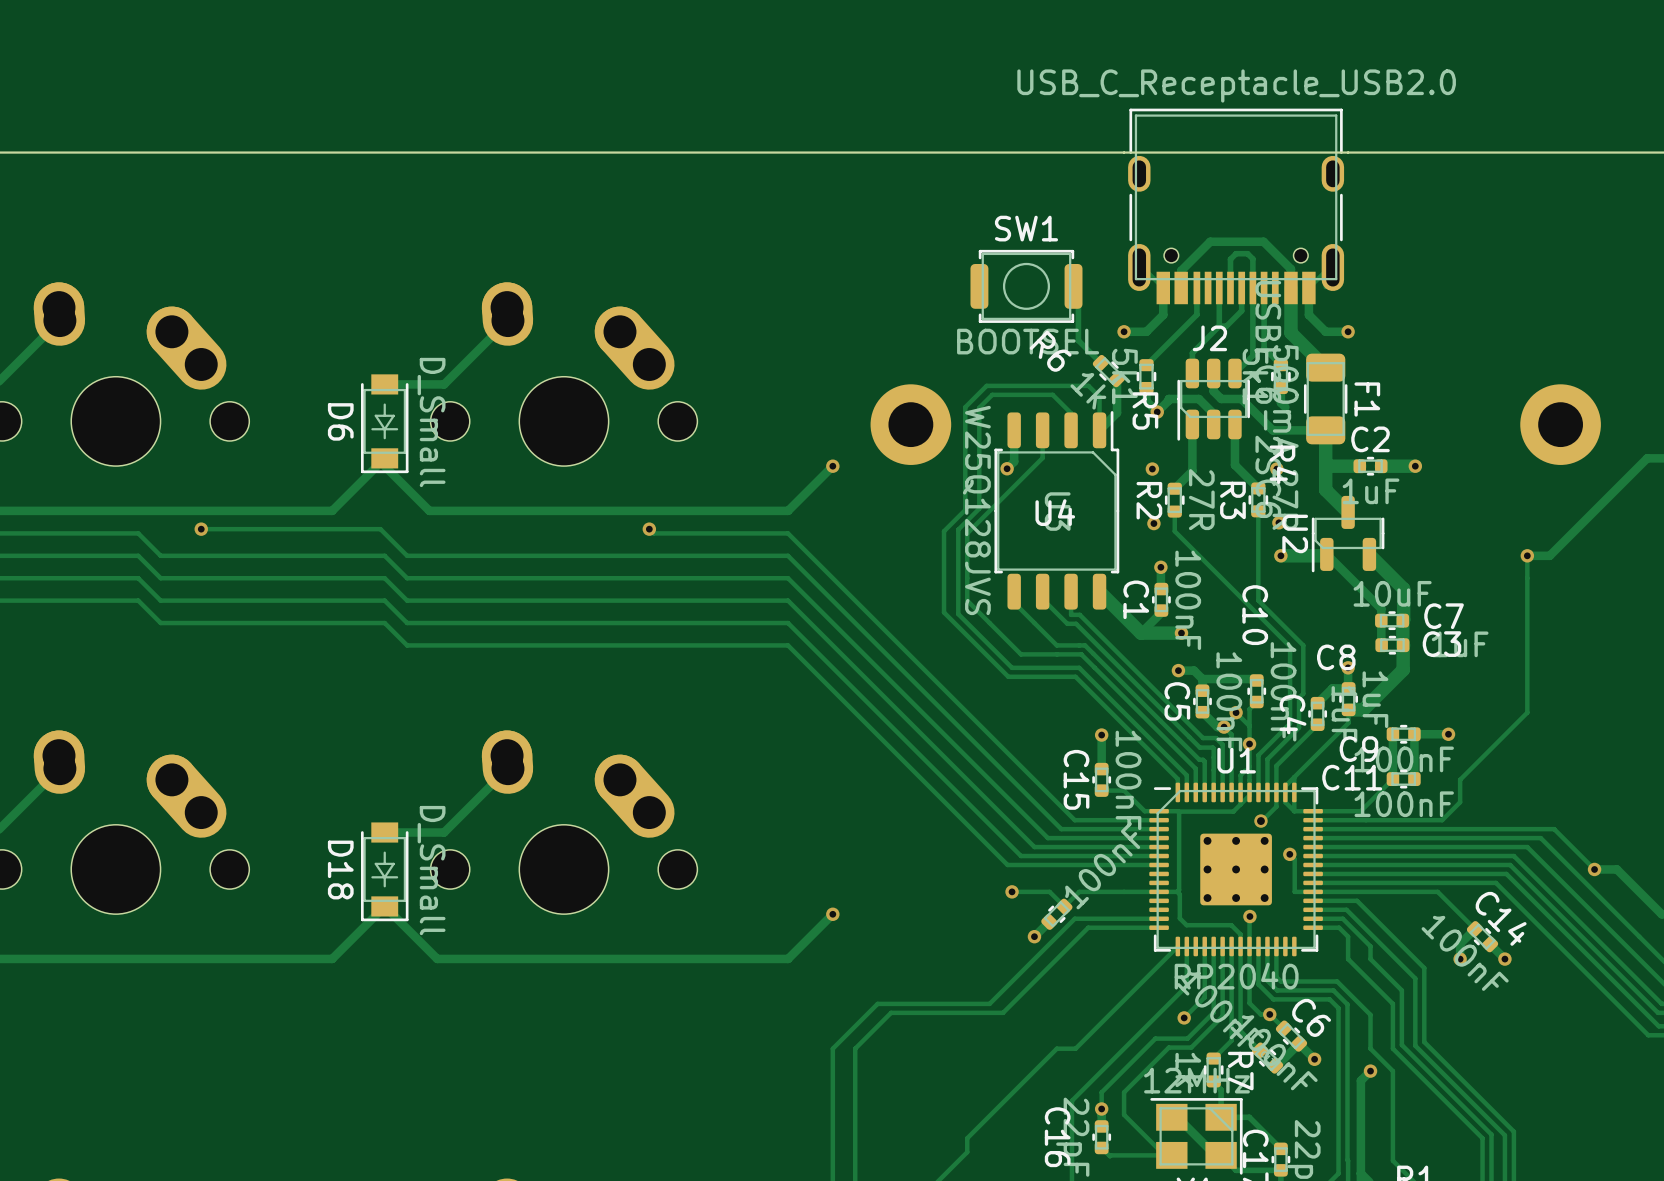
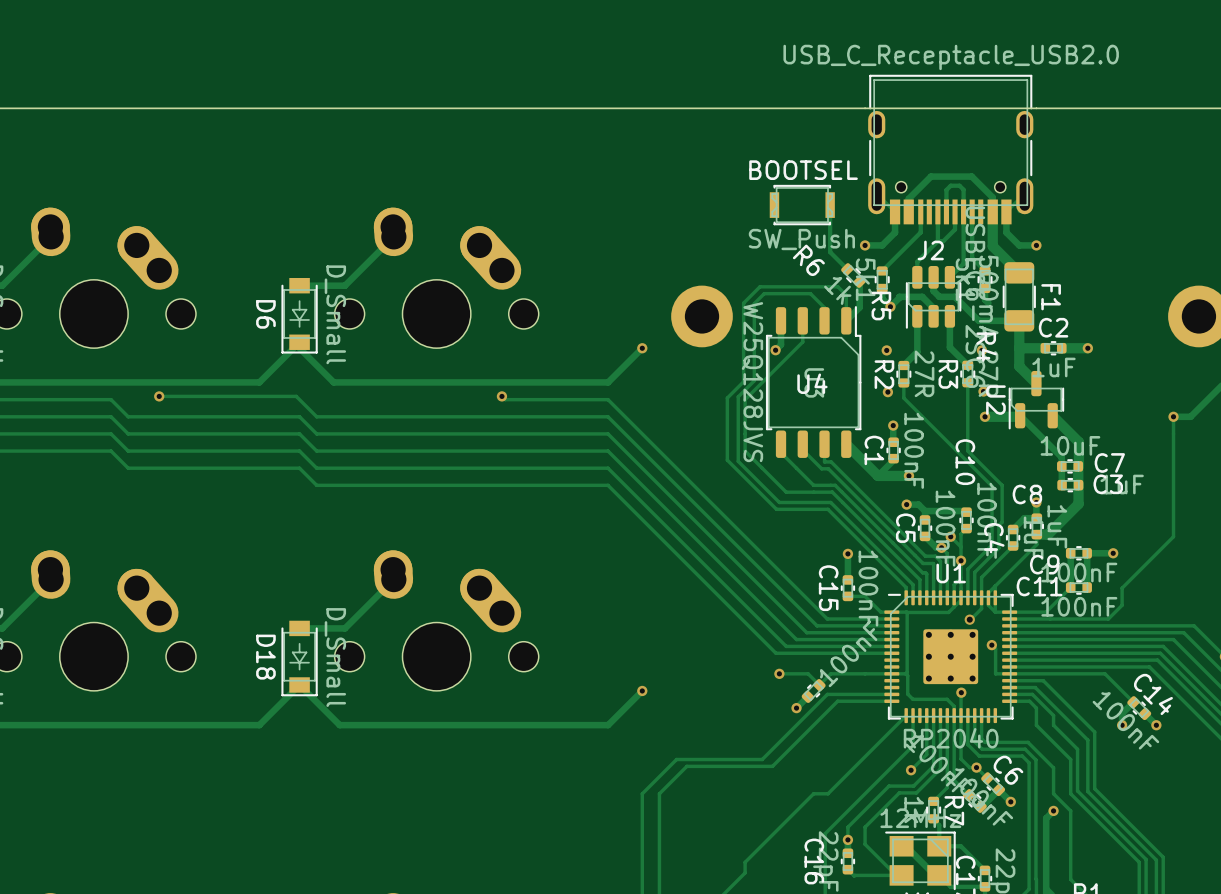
BOOTSEL: none -> SW_Push (802, 205)
SW1: BOOTSEL (1026, 286) -> none

